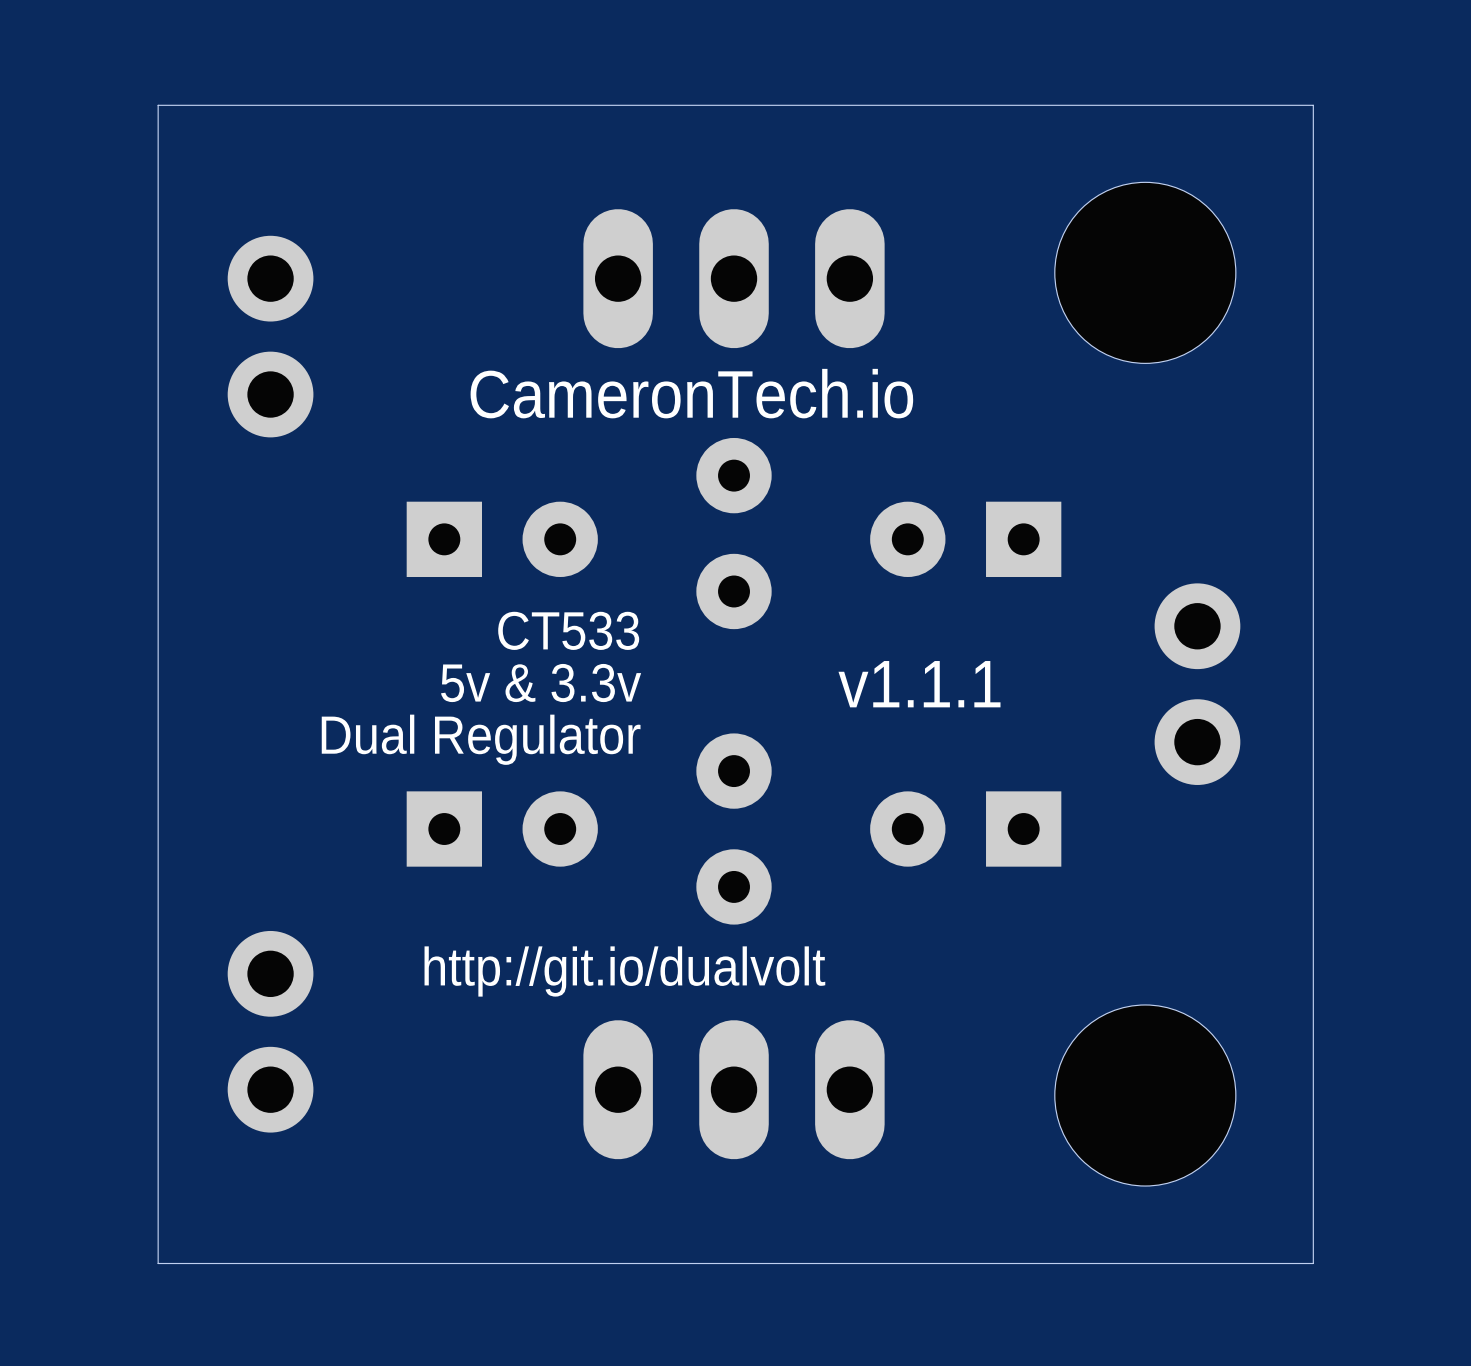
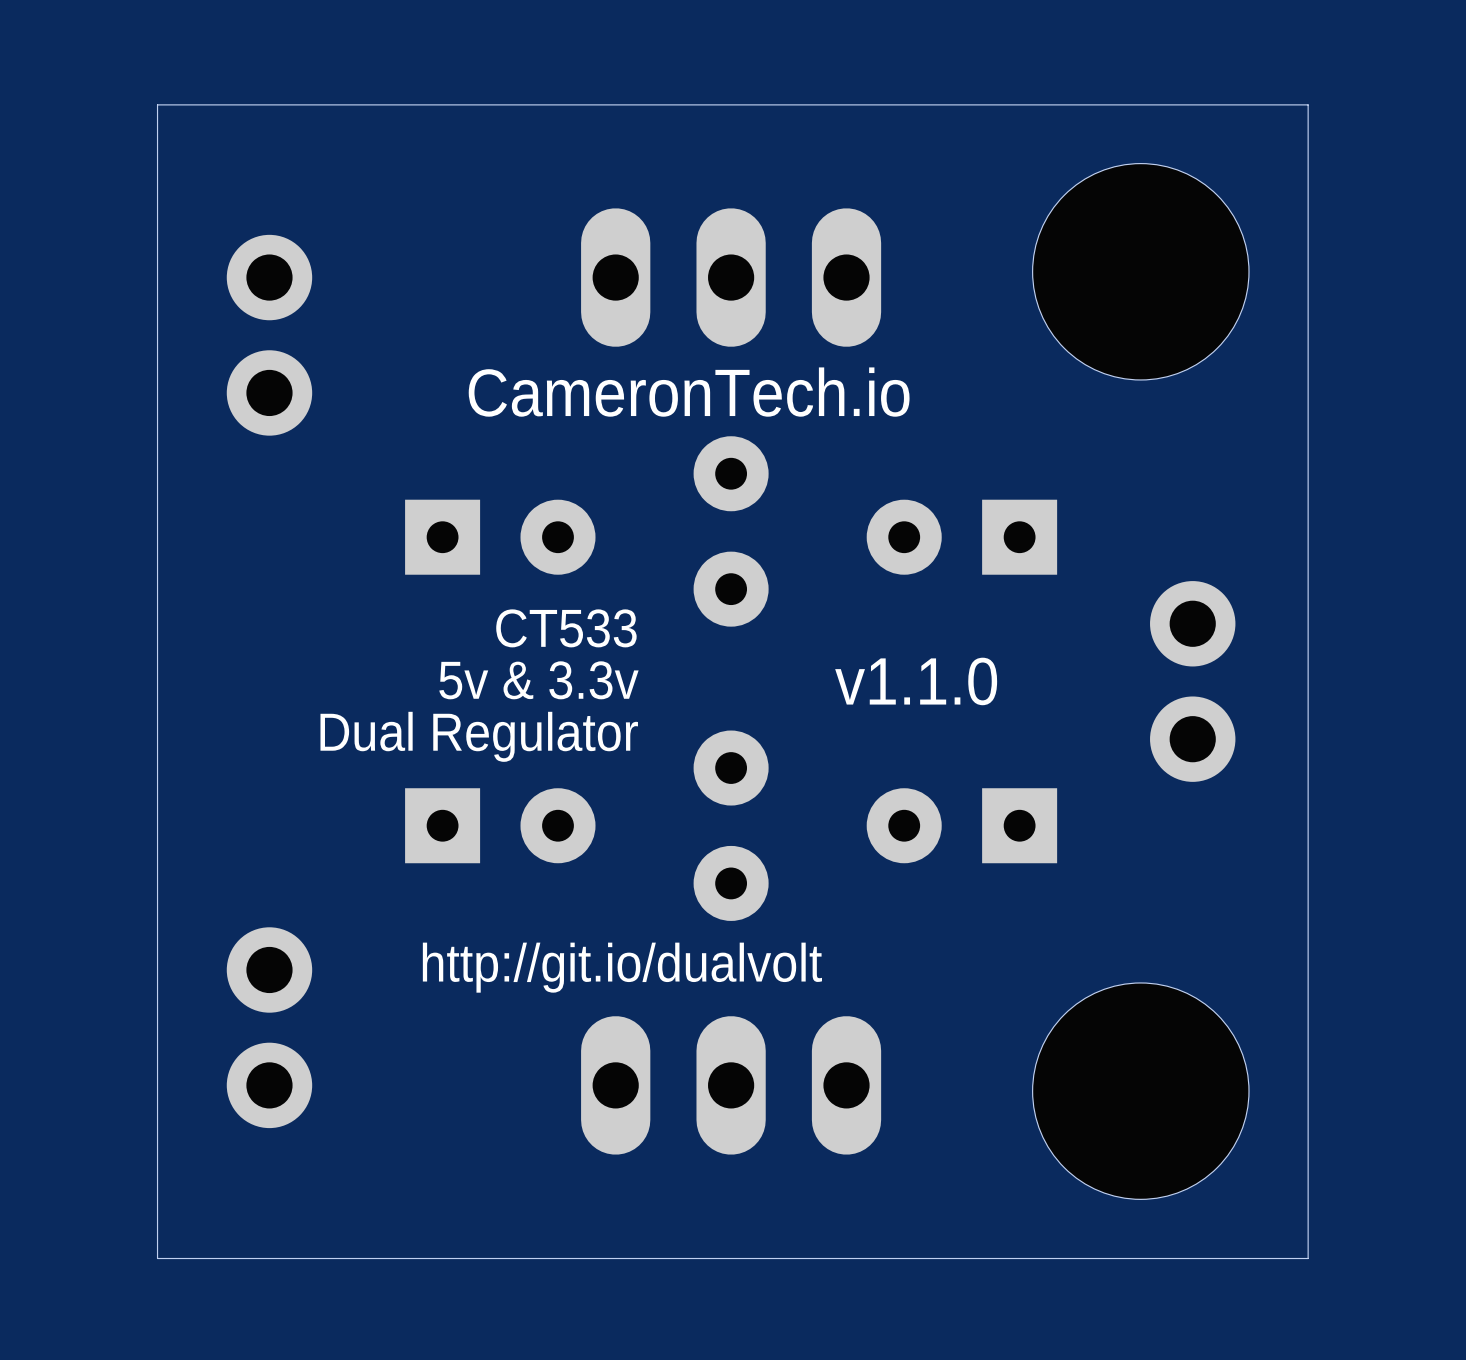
hole size: [1054, 182, 1236, 364] -> [1032, 163, 1249, 380]
text: v1.1.1 (919, 684) -> v1.1.0 (916, 681)
hole size: [1054, 1004, 1236, 1187] -> [1032, 982, 1249, 1200]

